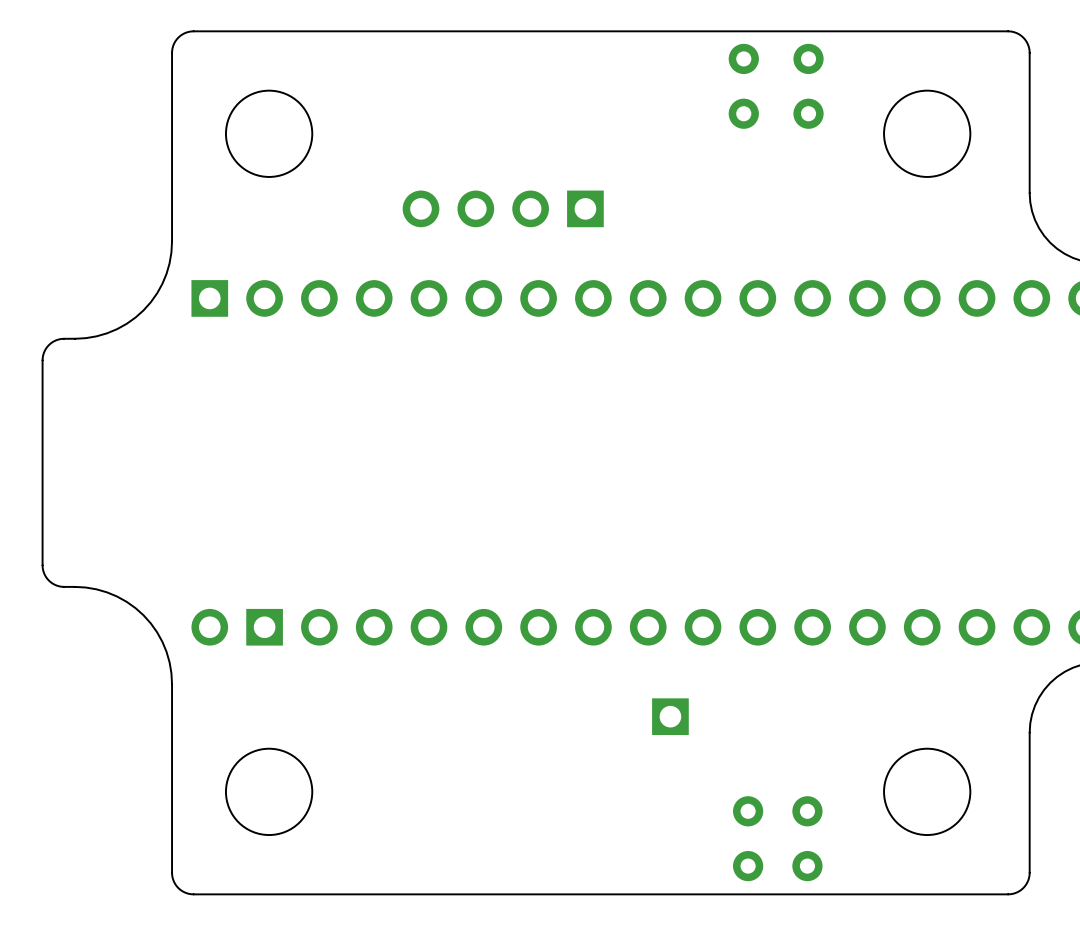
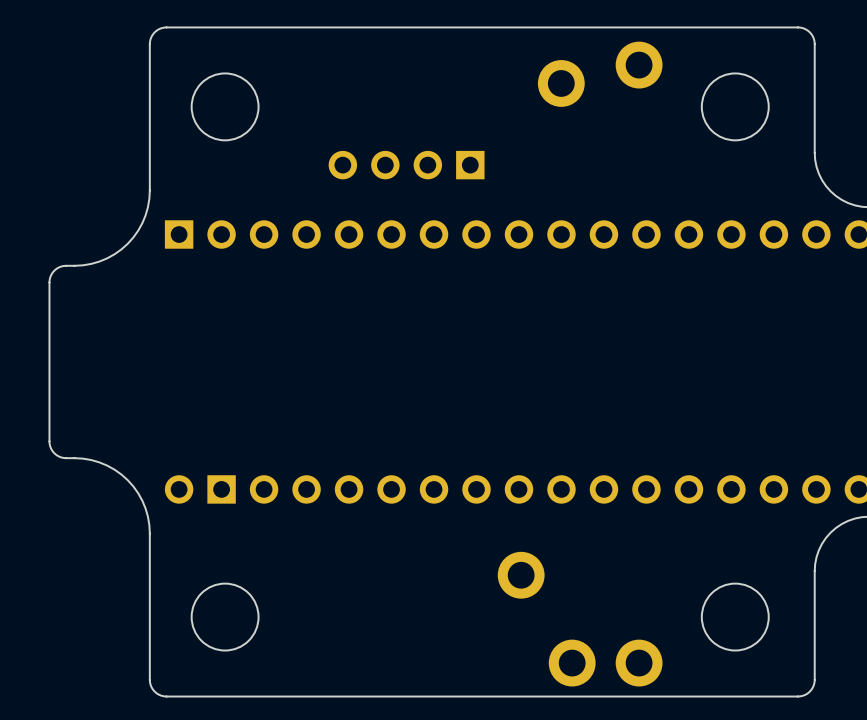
part footprint: [793, 43, 824, 129] -> [615, 41, 663, 89]
part: (743, 86) -> none
part: none -> (561, 83)
part: (670, 716) -> none
part: none -> (521, 575)
part footprint: [792, 796, 823, 882] -> [615, 639, 663, 687]
part: (748, 838) -> none
part: none -> (572, 663)

